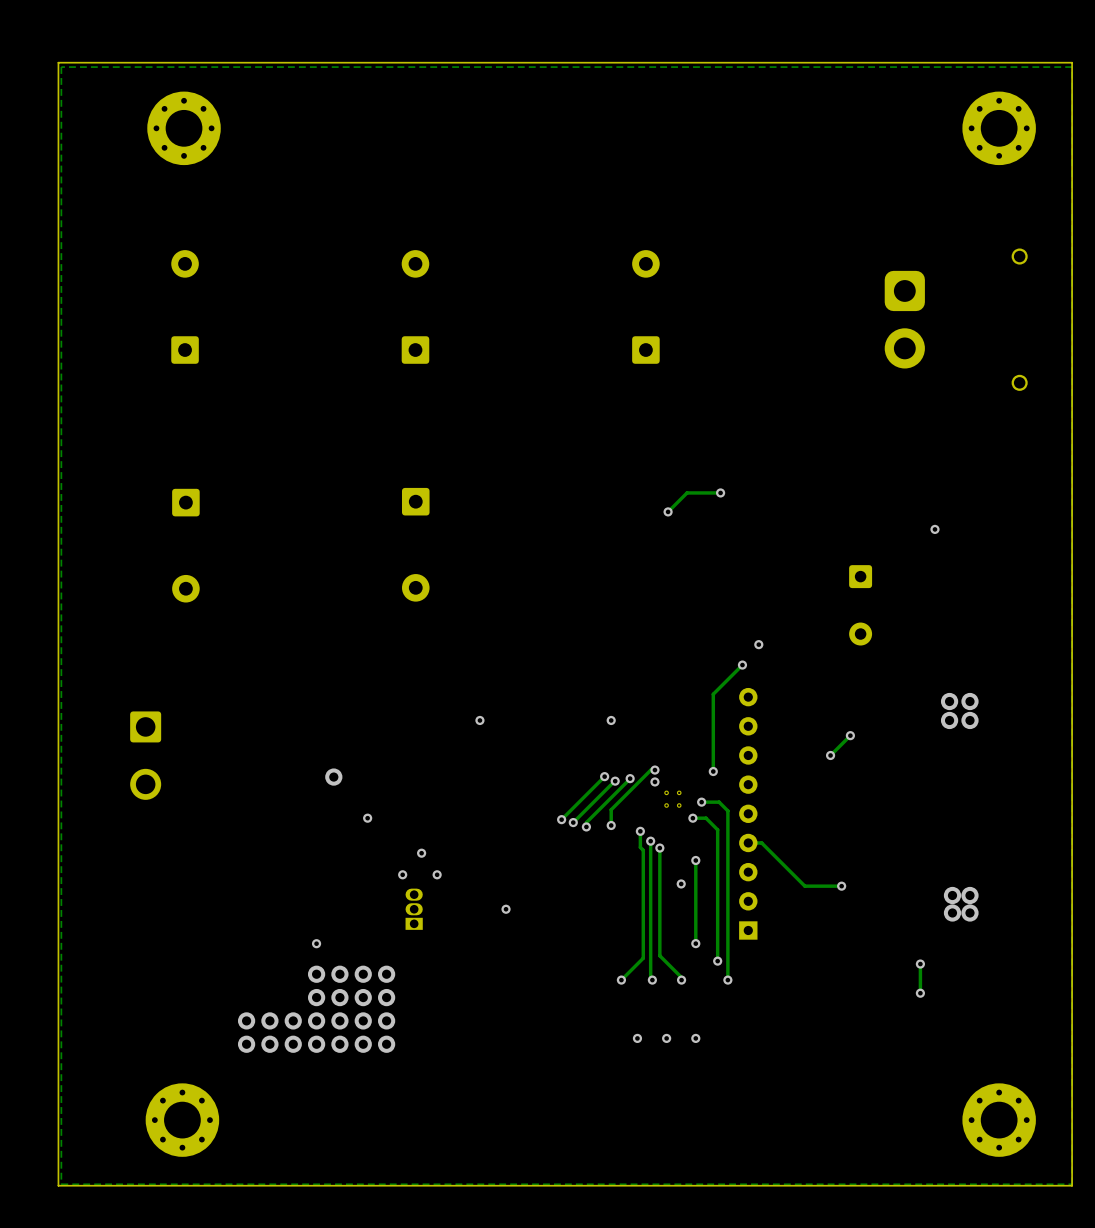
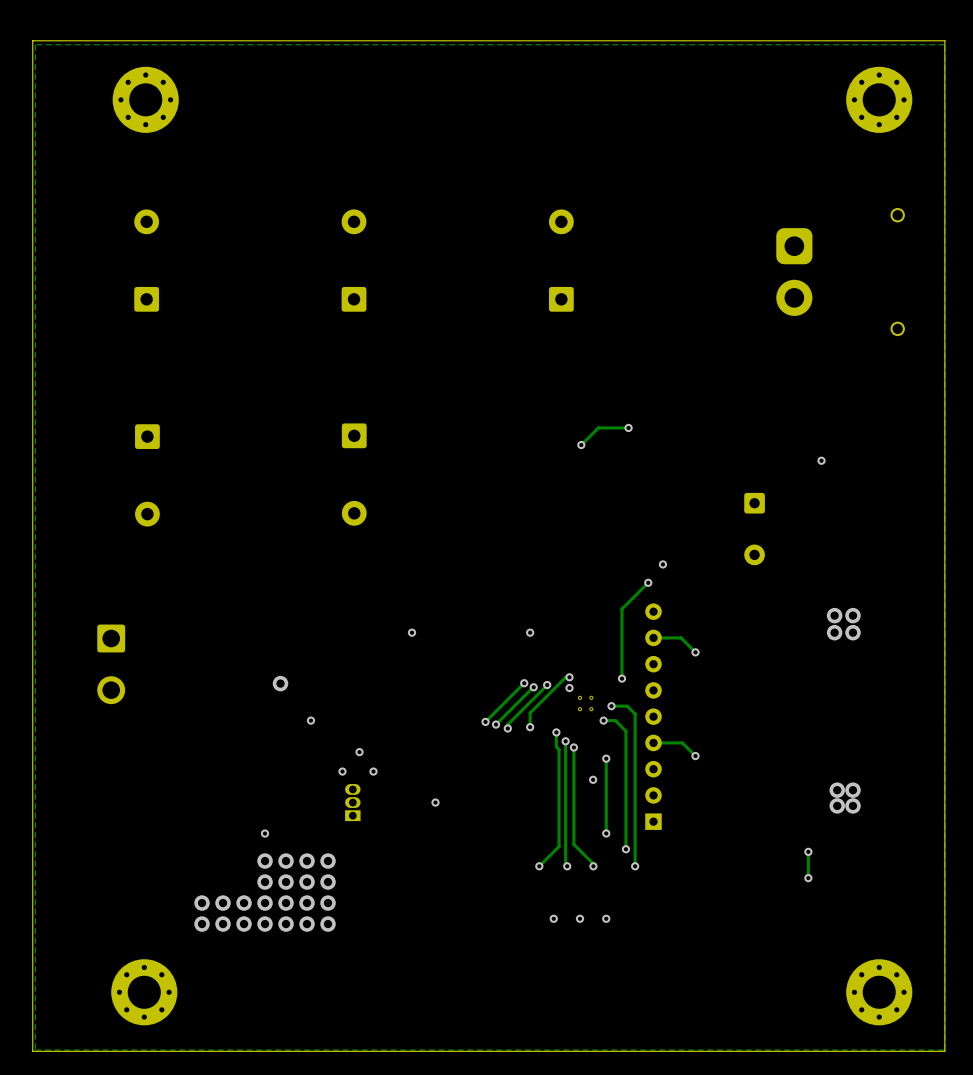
track: none -> (653, 637) (681, 637) (695, 652)
track: (850, 735) (830, 755) -> none
via: (850, 735) -> none
via: none -> (695, 652)
via: (830, 755) -> none
track: (761, 842) (804, 886) (841, 886) -> (665, 742) (682, 742) (695, 756)
via: none -> (695, 756)
via: (841, 886) -> none

